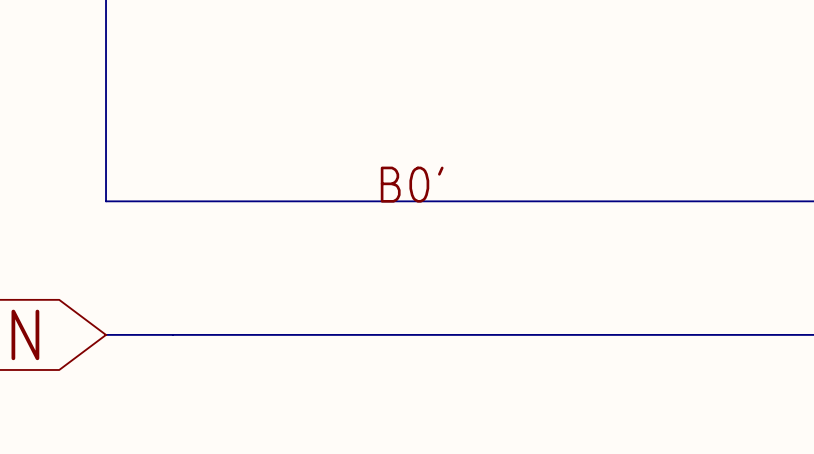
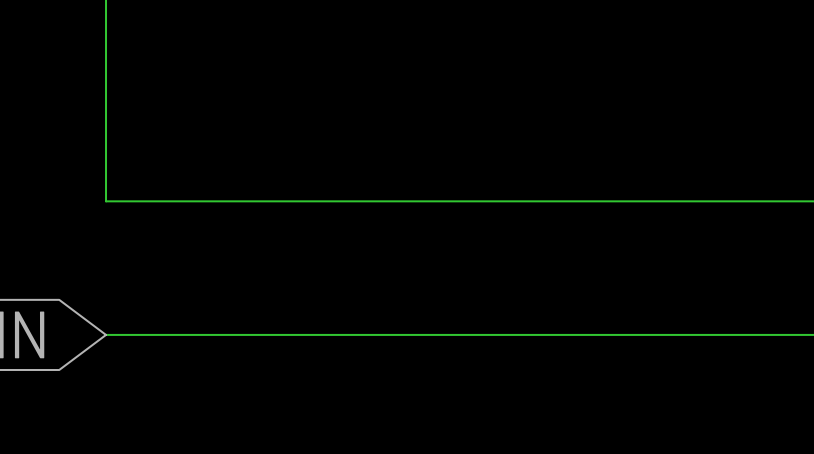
label: B0' (412, 184) -> none

